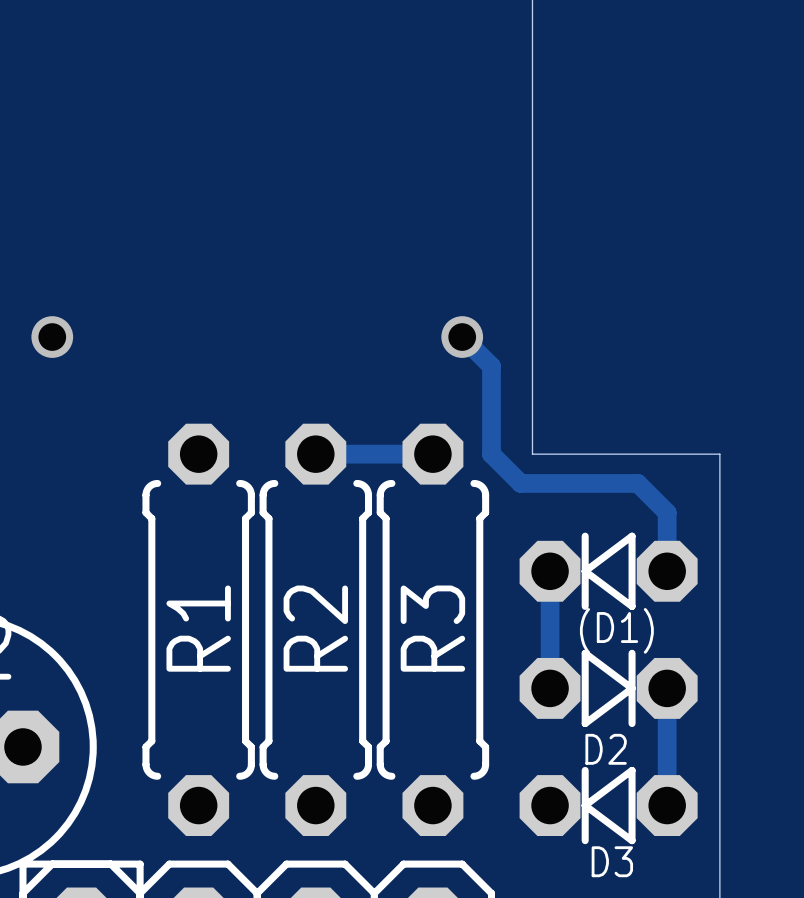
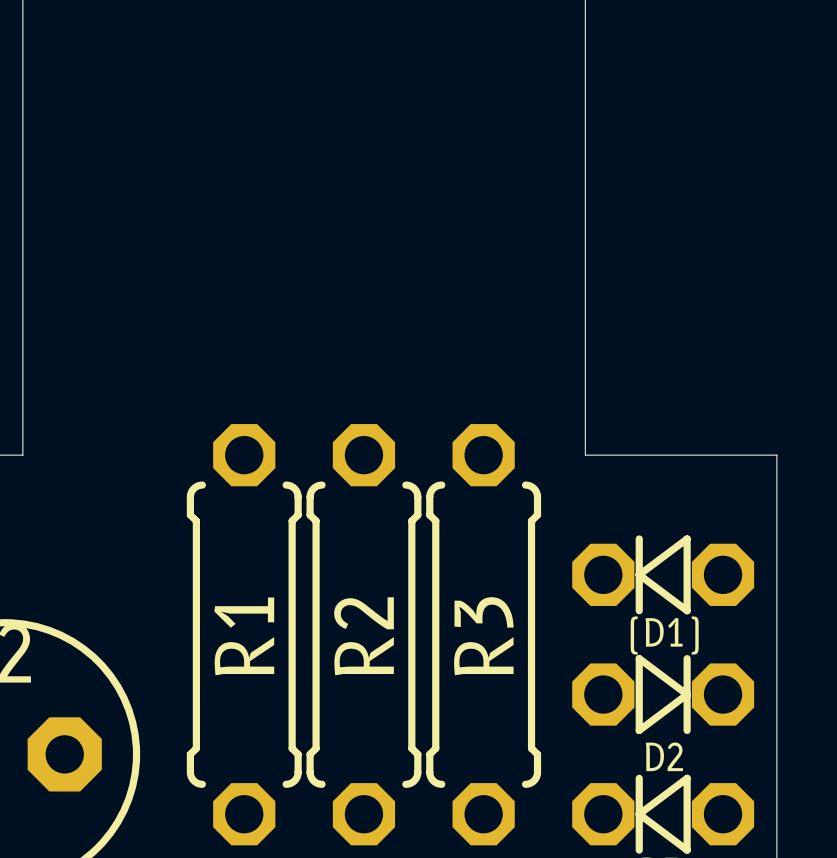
via: (52, 337) -> none
track: (462, 337) (491, 366) (491, 454) (520, 483) (637, 483) (667, 512) (667, 571) -> none
via: (462, 337) -> none
track: (315, 454) (432, 454) -> none
track: (550, 571) (550, 688) -> none
track: (667, 688) (667, 805) -> none

